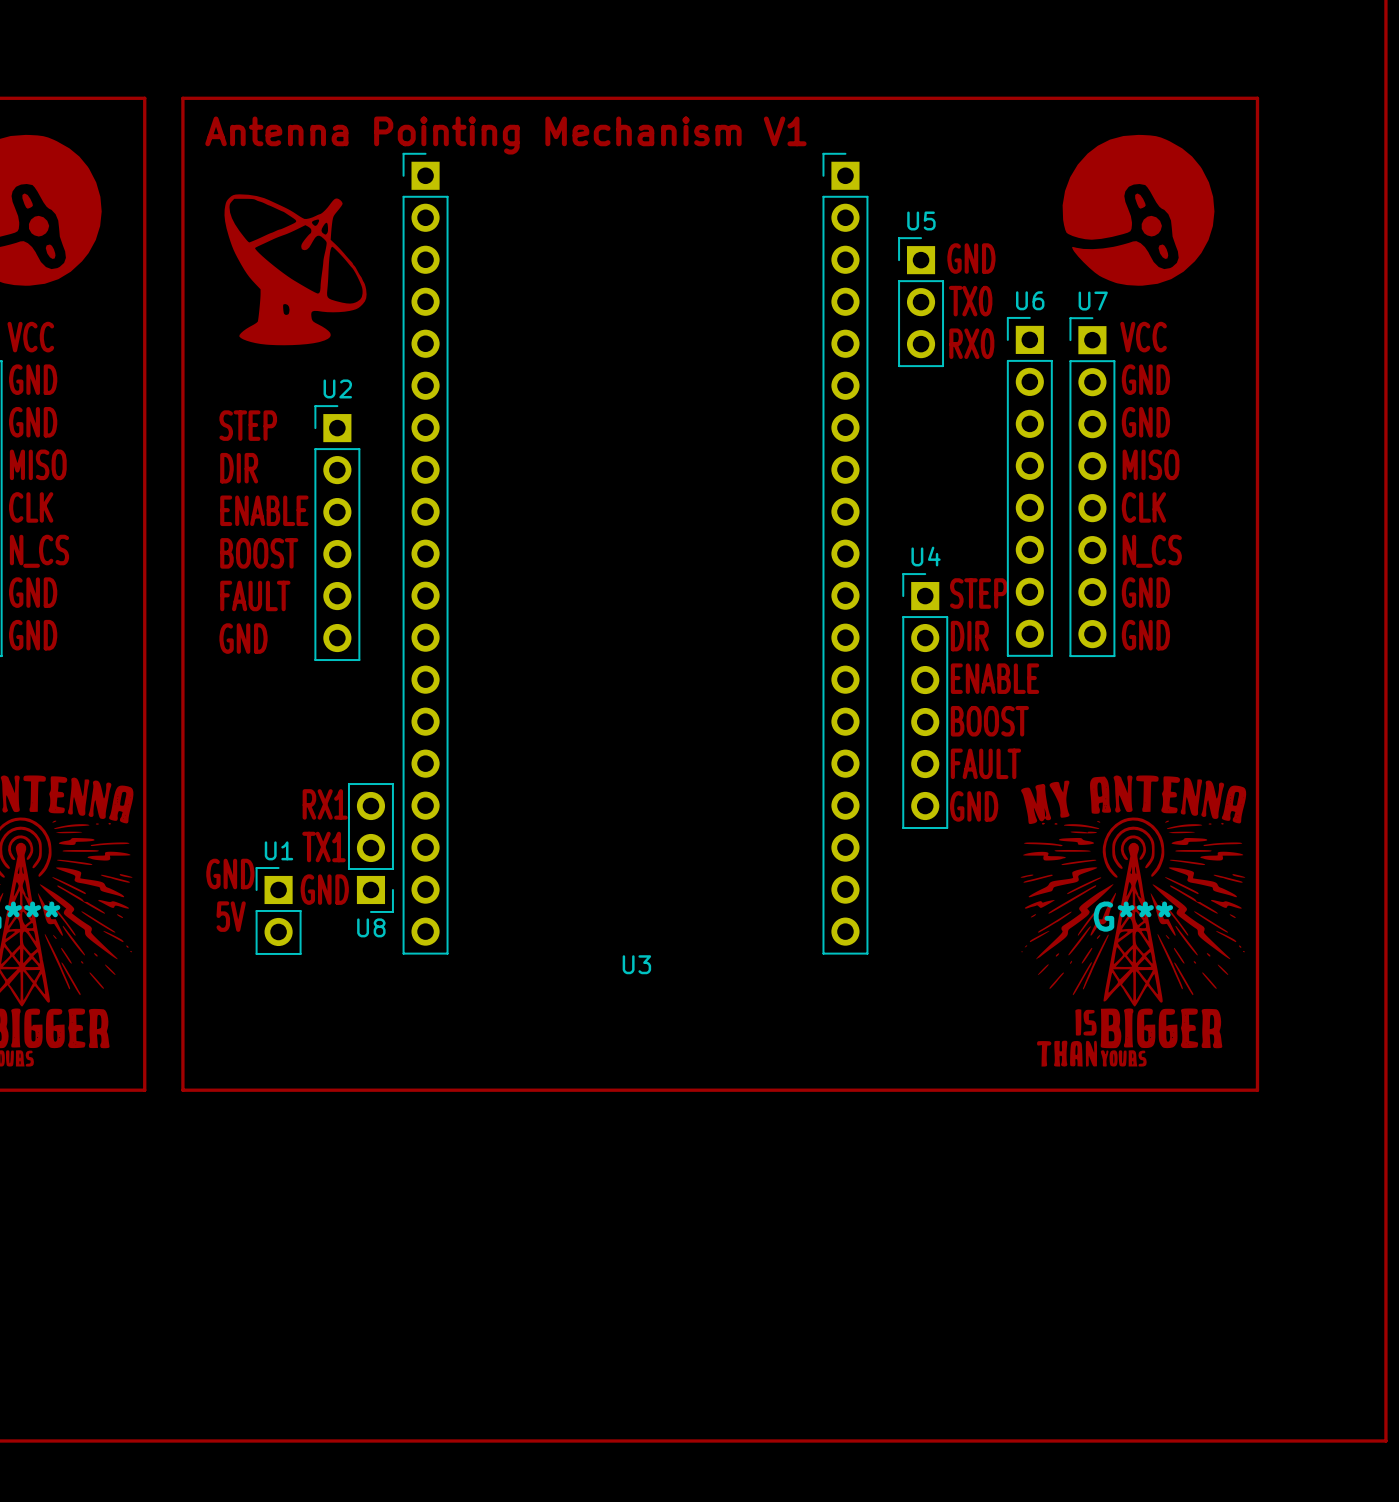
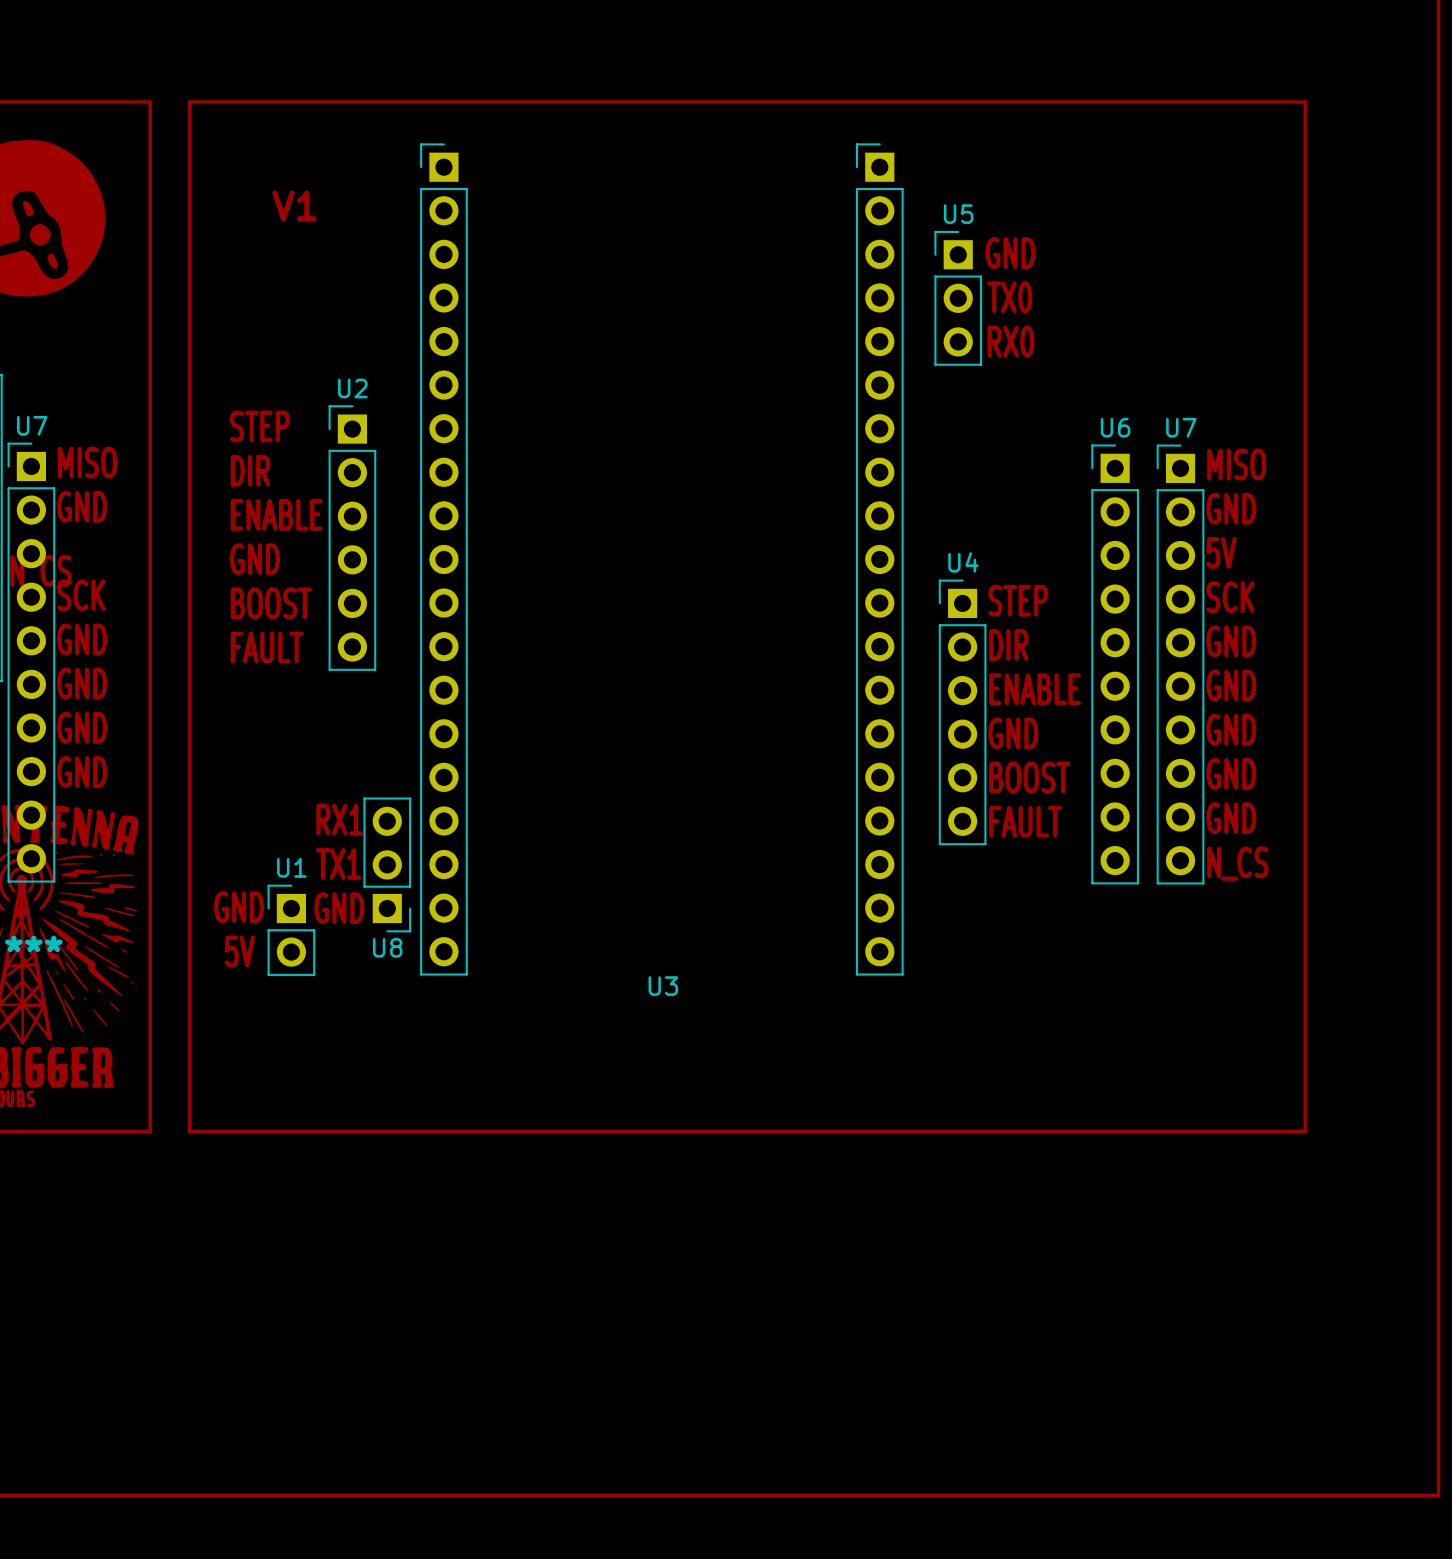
drawing: [1062, 134, 1215, 286] -> none
text: Antenna Pointing Mechanism V1 (505, 135) -> none
drawing: [224, 194, 367, 346] -> none
text: none -> V1 (294, 205)
text position: GND (971, 258) -> GND (1010, 253)
text position: TX0 (970, 301) -> TX0 (1009, 297)
U5 position: (921, 302) -> (958, 298)
text: VCC (30, 337) -> none
text: VCC (1143, 337) -> none
text position: RX0 (971, 343) -> RX0 (1010, 341)
text: GND (33, 379) -> none
text: GND (1145, 379) -> none
text: GND (33, 422) -> none
text: GND (1145, 422) -> none
text position: STEP (248, 425) -> STEP (259, 426)
text position: MISO (38, 464) -> MISO (87, 462)
text position: MISO (1151, 464) -> MISO (1236, 464)
text position: DIR (239, 468) -> DIR (250, 470)
U6: (1029, 486) -> none
U7: (1092, 487) -> none
text: none -> GND (82, 506)
text: none -> GND (1231, 508)
text: CLK (31, 507) -> none
text: CLK (1143, 507) -> none
text position: ENABLE (264, 510) -> ENABLE (276, 514)
text: none -> 5V (1221, 552)
U2 position: (337, 533) -> (352, 538)
text: none -> GND (255, 559)
text position: N_CS (1152, 551) -> N_CS (1237, 863)
text position: BOOST (259, 553) -> BOOST (271, 603)
U3 position: (635, 553) -> (661, 559)
text: none -> SCK (81, 595)
text: none -> SCK (1230, 597)
text: GND (33, 592) -> none
text: GND (1145, 592) -> none
text position: STEP (978, 593) -> STEP (1018, 600)
text position: FAULT (255, 595) -> FAULT (267, 647)
text: none -> GND (82, 639)
text: none -> GND (1231, 641)
text: GND (33, 635) -> none
text: GND (1145, 635) -> none
text position: DIR (969, 636) -> DIR (1008, 644)
U7: none -> (31, 662)
text: GND (243, 638) -> none
U6: none -> (1115, 664)
U7: none -> (1180, 664)
text: none -> GND (82, 683)
text: none -> GND (1231, 685)
text position: ENABLE (995, 678) -> ENABLE (1035, 689)
text: none -> GND (82, 727)
U4 position: (925, 701) -> (962, 712)
text: none -> GND (1231, 729)
text: none -> GND (1013, 733)
text position: BOOST (989, 721) -> BOOST (1029, 777)
text: none -> GND (82, 772)
text: none -> GND (1231, 773)
text position: FAULT (985, 763) -> FAULT (1025, 821)
text: none -> GND (1231, 818)
text position: RX1 (325, 804) -> RX1 (339, 819)
text: GND (974, 806) -> none
text position: TX1 (323, 847) -> TX1 (338, 863)
U8 position: (370, 848) -> (387, 864)
text position: GND (324, 889) -> GND (339, 908)
U1 position: (278, 910) -> (291, 930)
G***: (1133, 921) -> none

